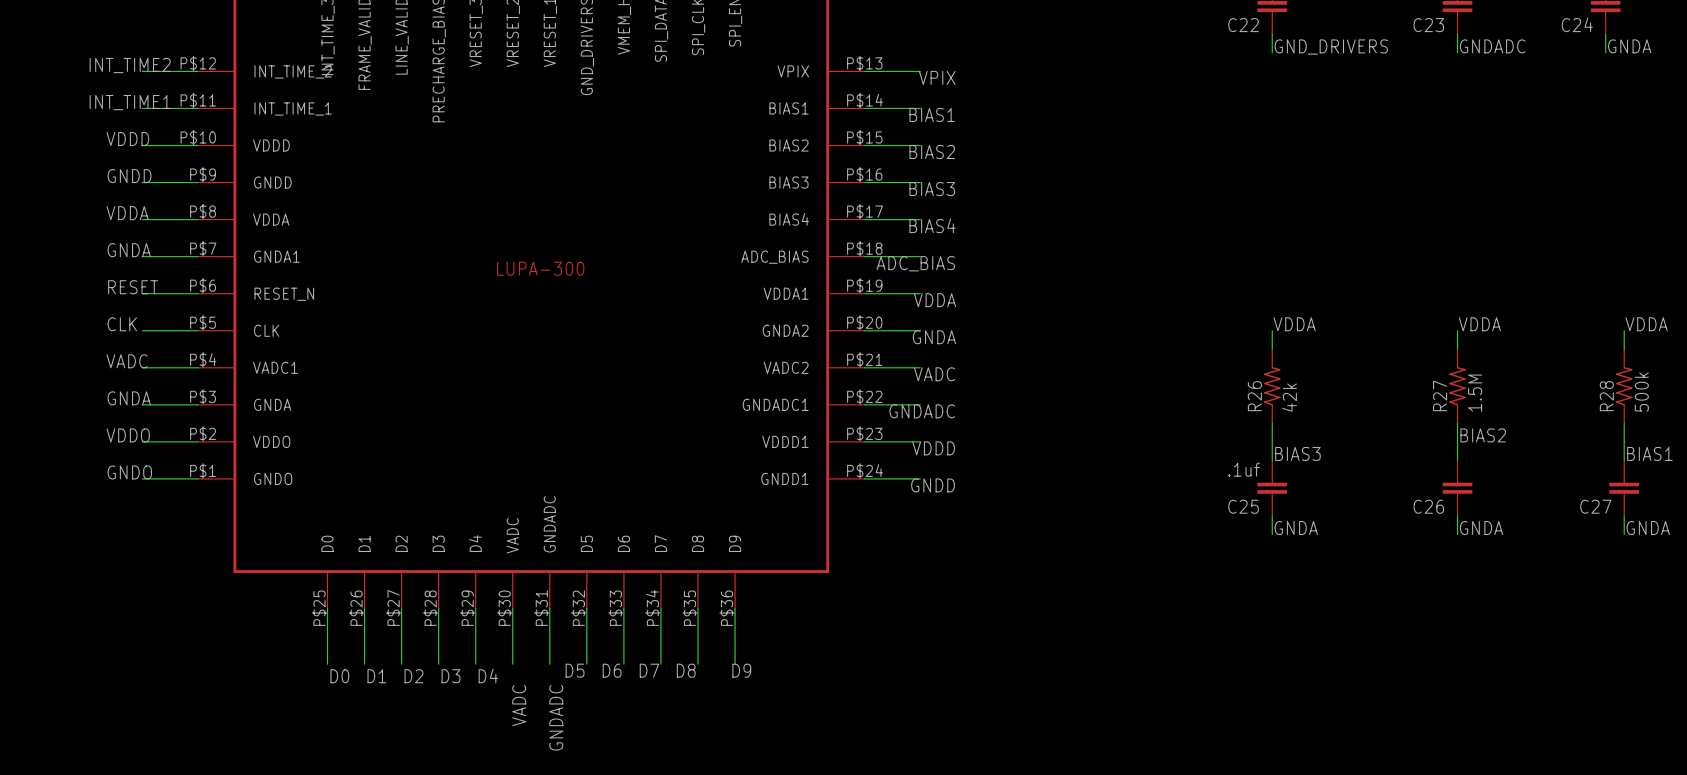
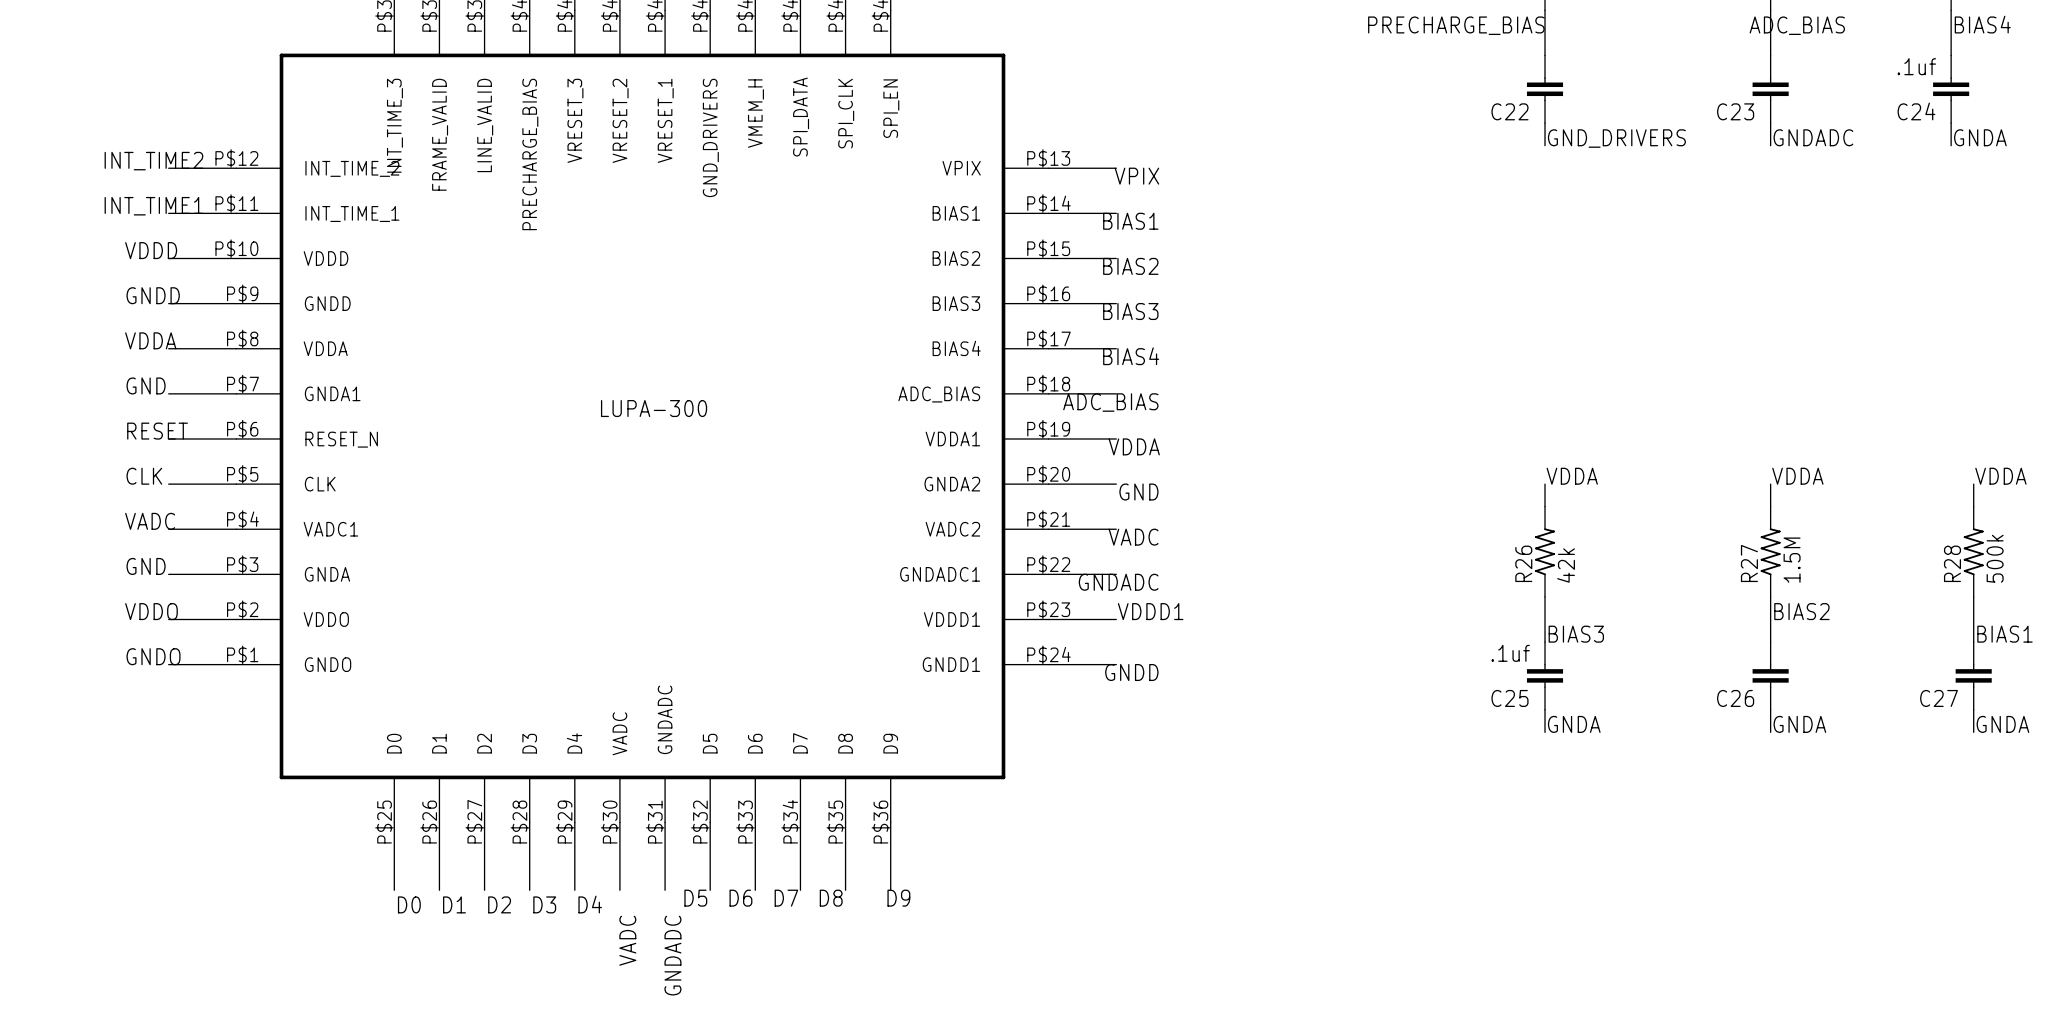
label: GNDA (129, 250) -> GND (146, 385)
label: GNDA (934, 337) -> GND (1138, 492)
label: GNDA (129, 398) -> GND (146, 566)
label: VDDD (933, 448) -> VDDD1 (1150, 611)

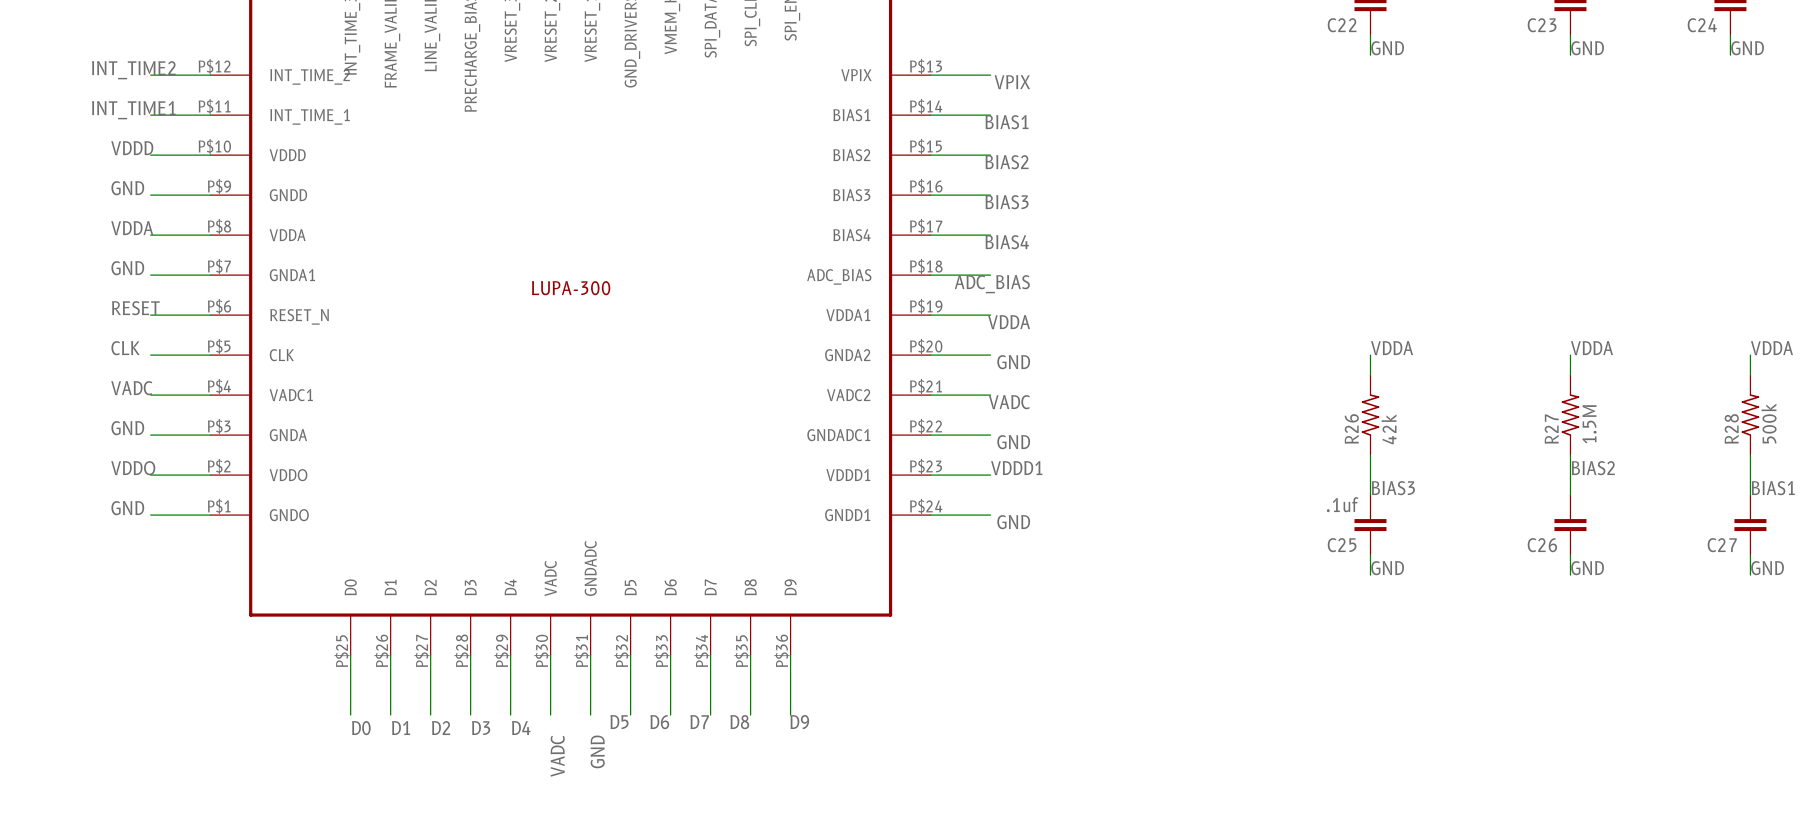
label: GNDADC (1813, 137) -> GND (1587, 48)
label: GNDA (1980, 137) -> GND (1747, 48)
label: GND_DRIVERS (1616, 138) -> GND (1387, 48)
label: GNDD (153, 295) -> GND (127, 188)
label: GNDADC (1118, 582) -> GND (1013, 442)
label: GNDO (153, 656) -> GND (127, 508)
label: GNDD (1131, 672) -> GND (1013, 522)
label: GNDA (1574, 724) -> GND (1387, 568)
label: GNDA (1799, 724) -> GND (1587, 568)
label: GNDA (2002, 724) -> GND (1767, 568)
label: GNDADC (672, 955) -> GND (597, 751)

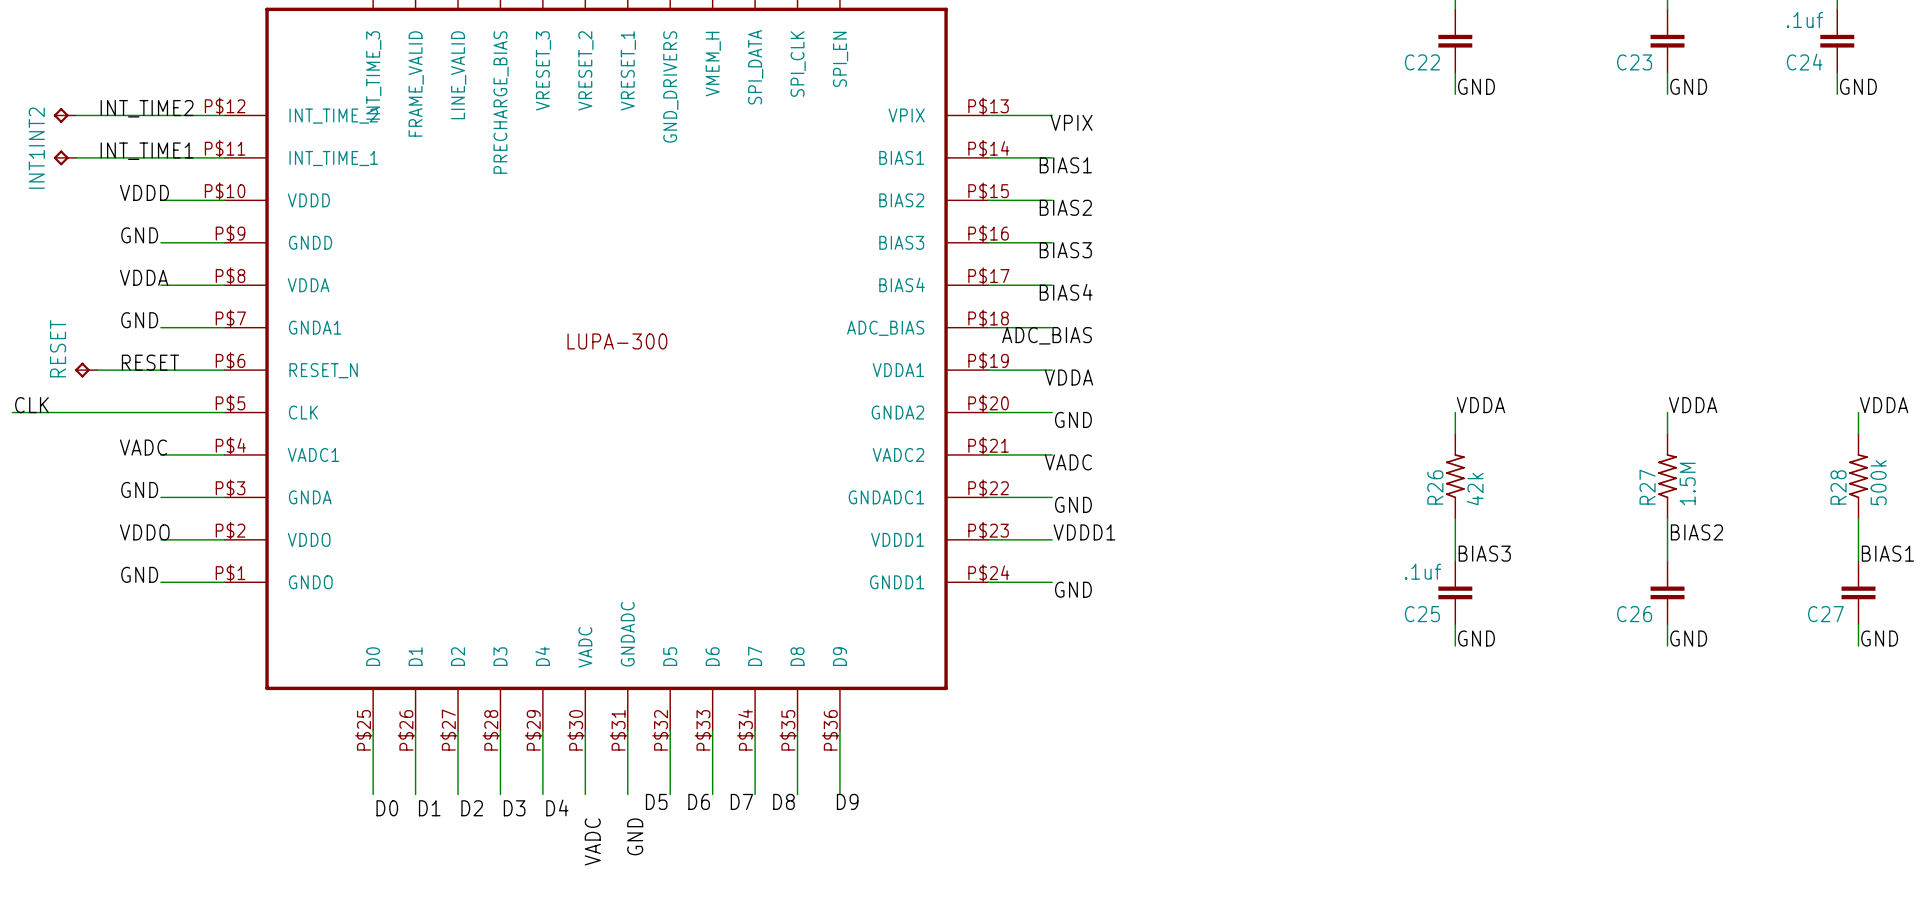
INT2: none -> (64, 115)
wire: none -> (76, 115) (160, 115)
INT1: none -> (64, 157)
wire: none -> (76, 157) (160, 157)
RESET: none -> (86, 370)
wire: none -> (97, 370) (160, 370)
label position: CLK (125, 348) -> CLK (31, 405)
wire: none -> (12, 412) (160, 412)

